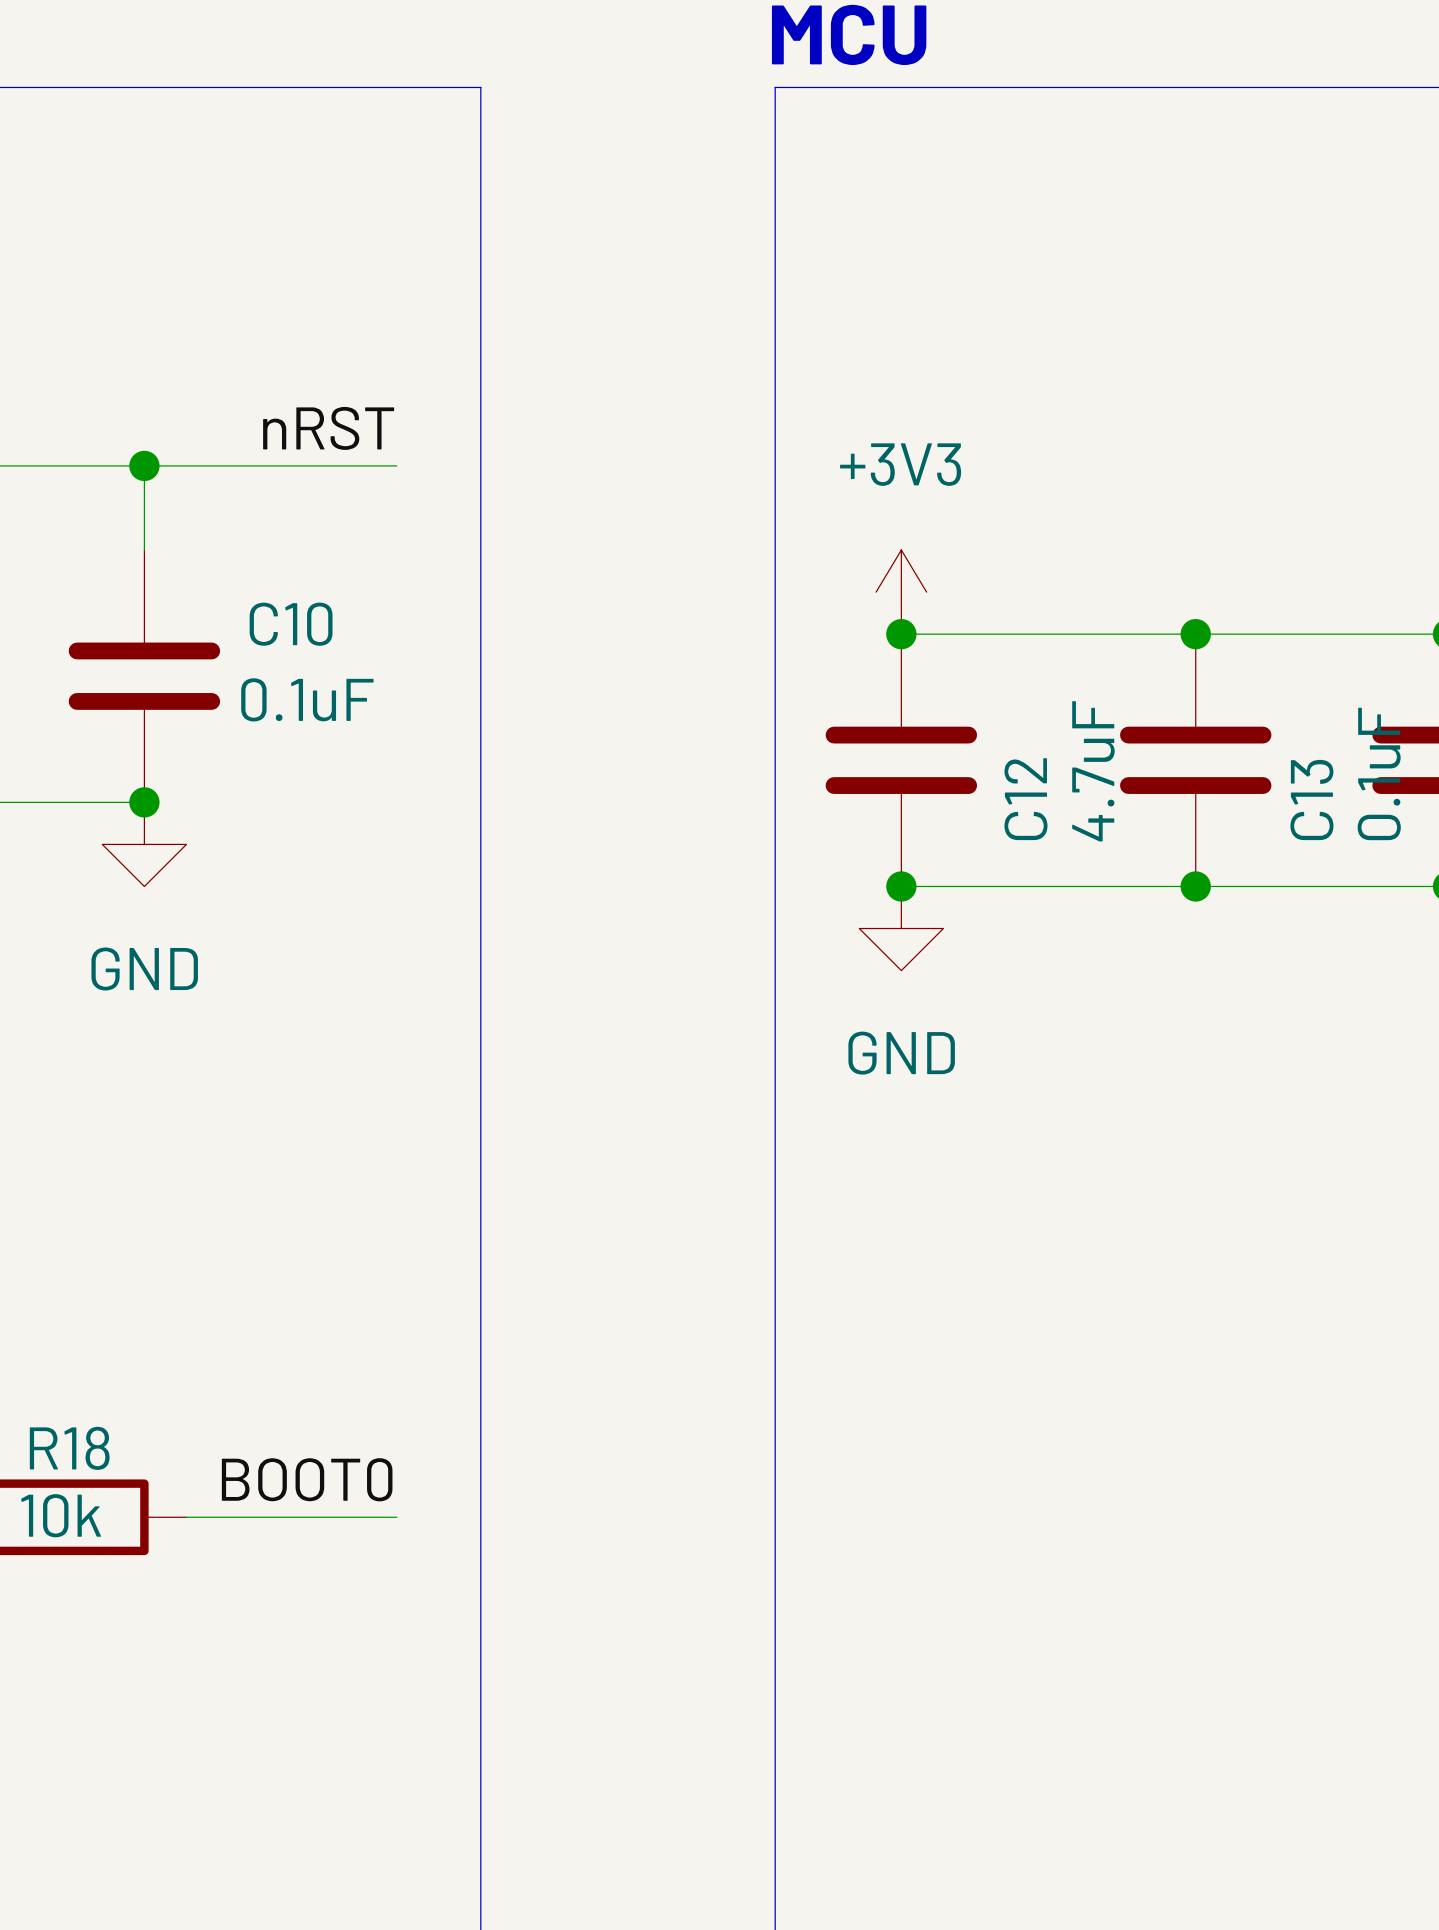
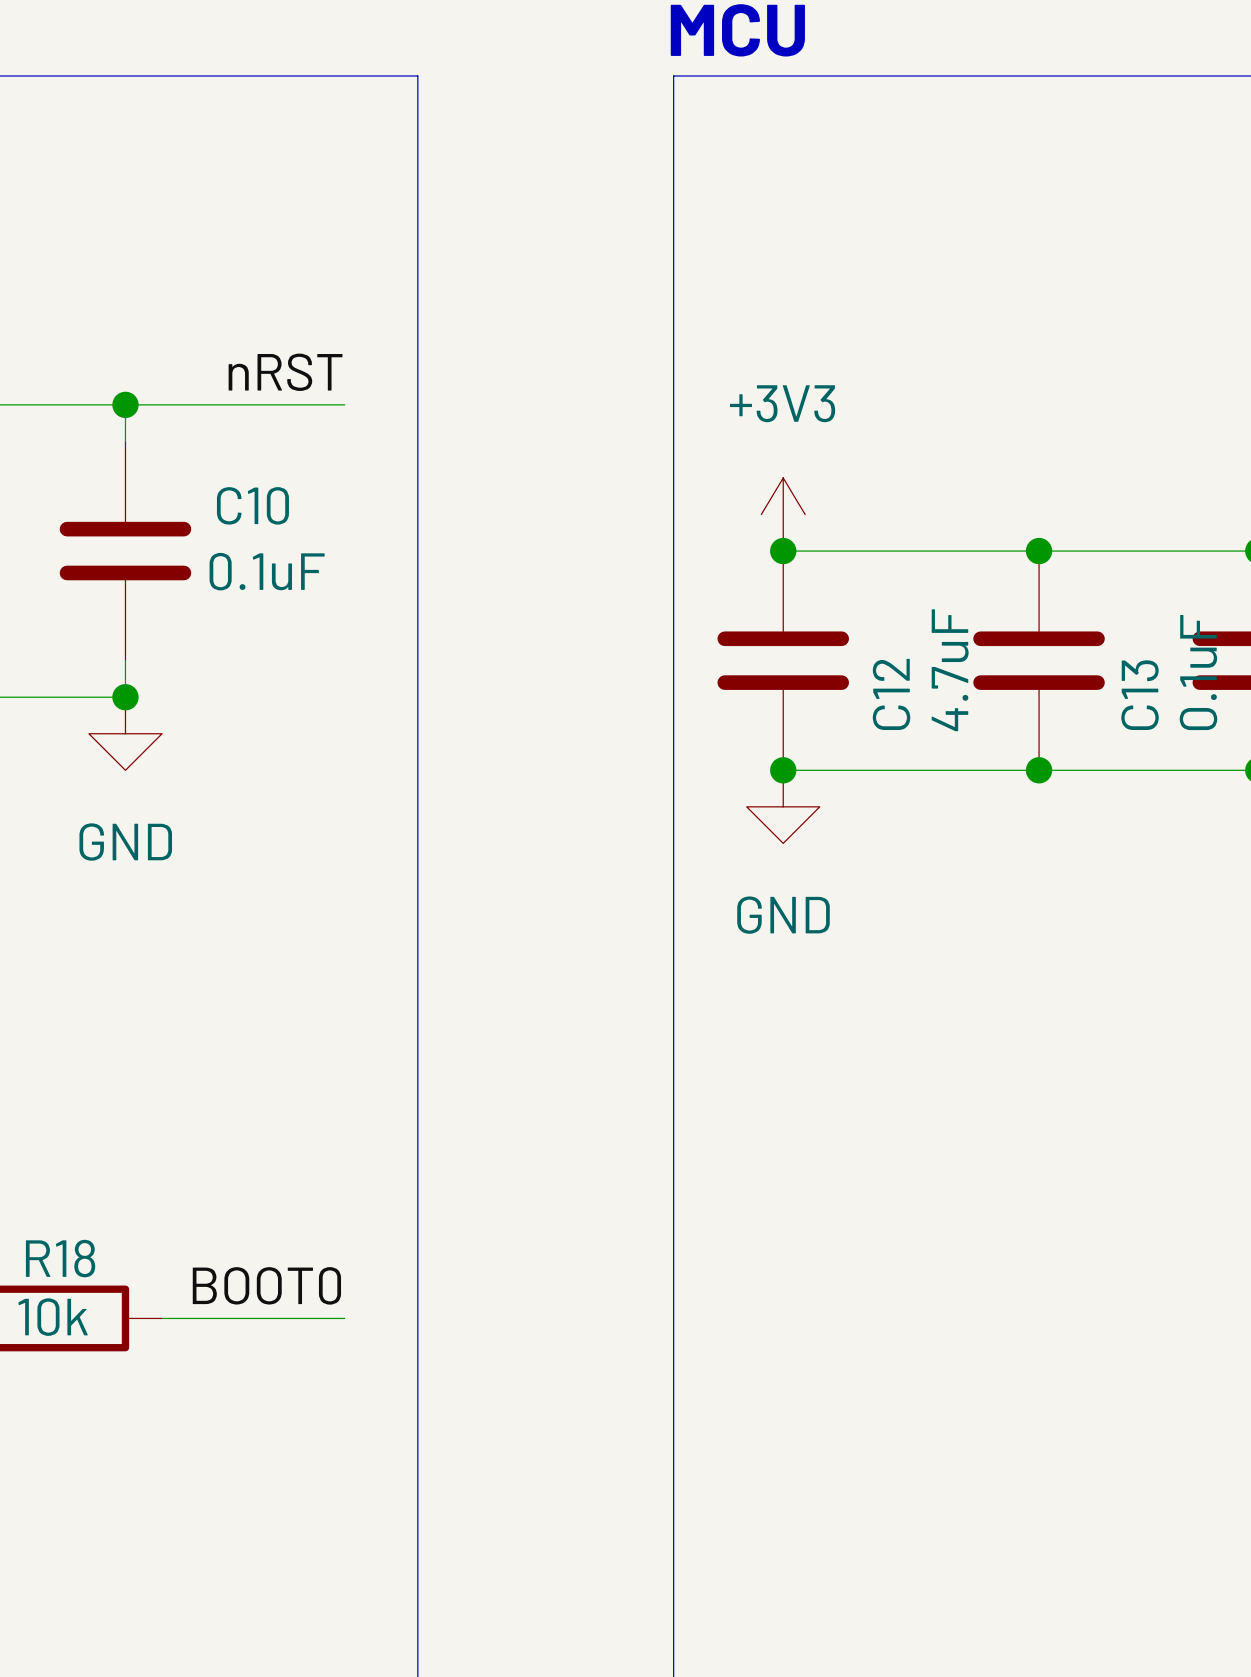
C10 position: (144, 676) -> (125, 551)

